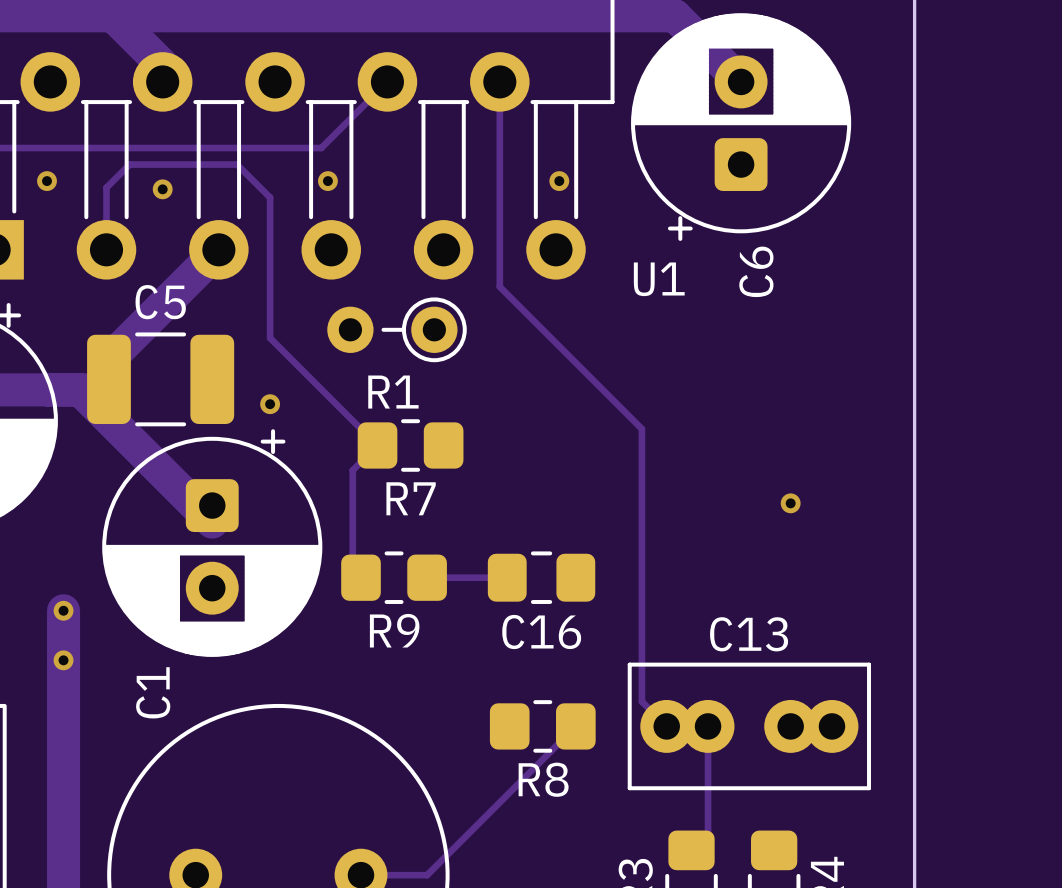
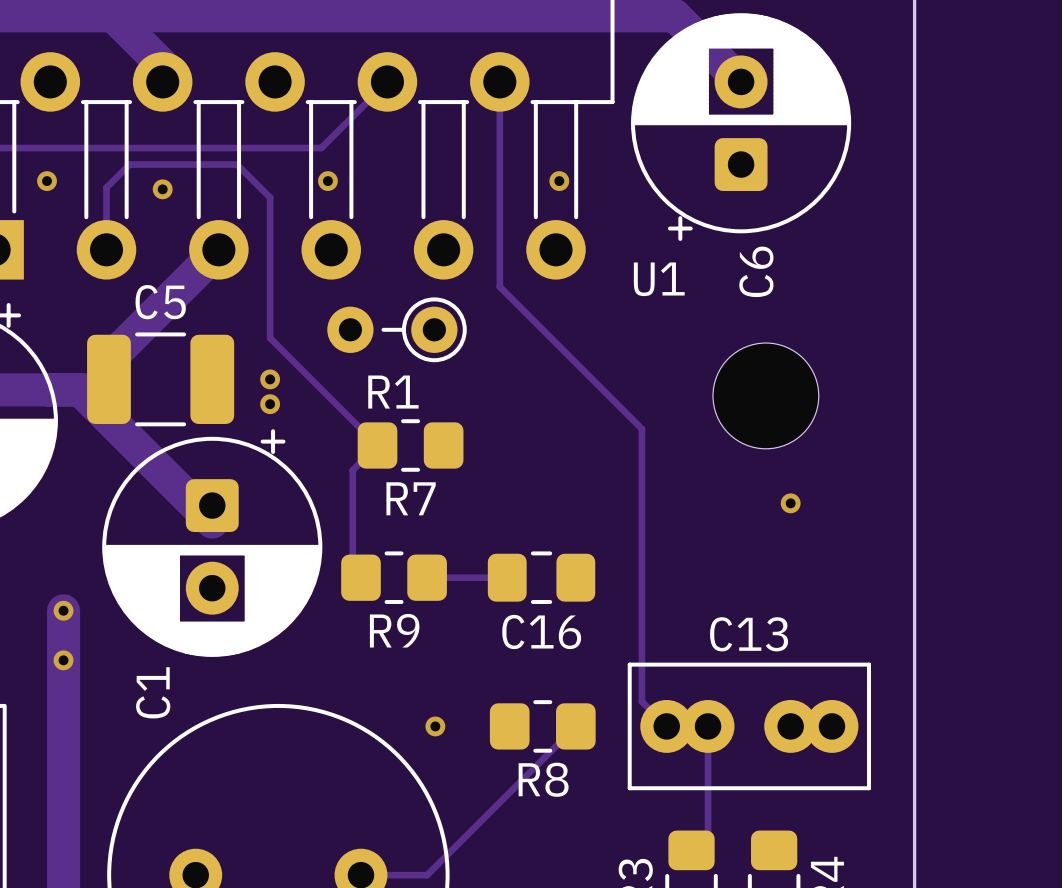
via: none -> (270, 379)
part: none -> (765, 395)
via: none -> (435, 726)

